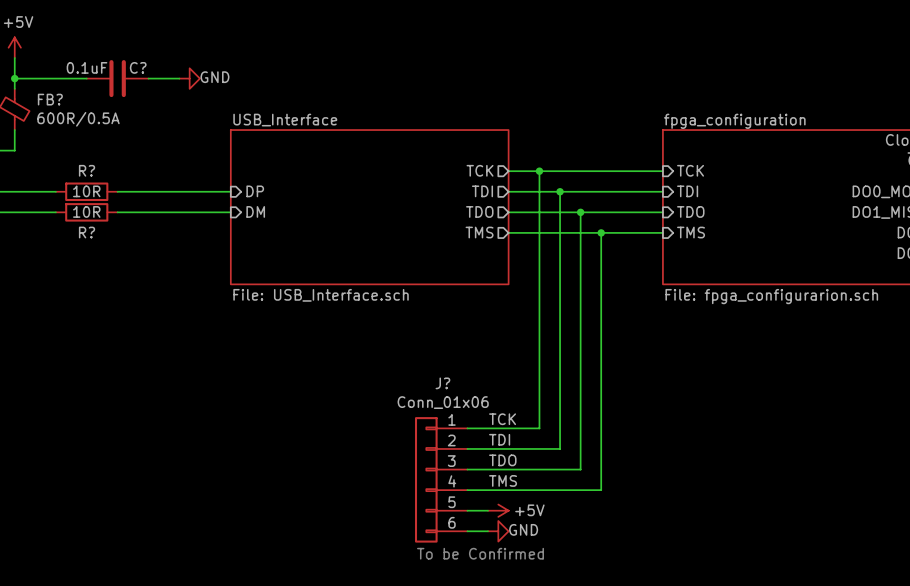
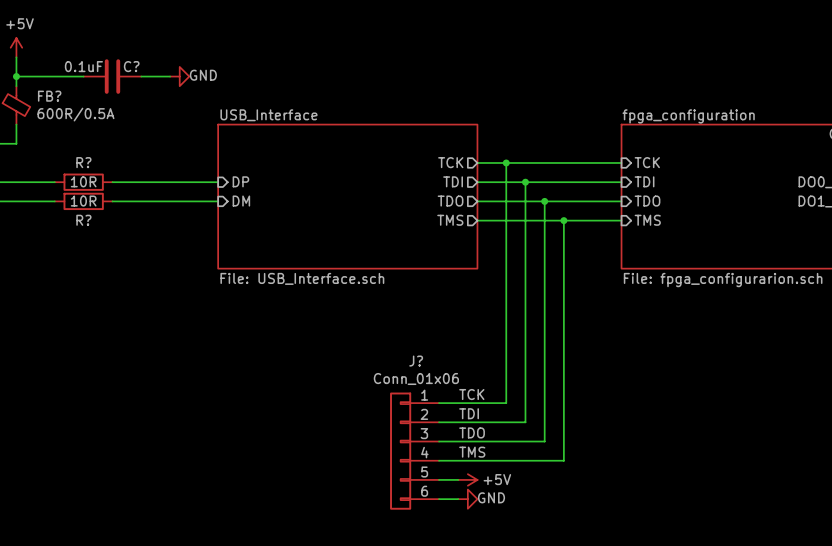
text: To be Confirmed (480, 553) -> none

